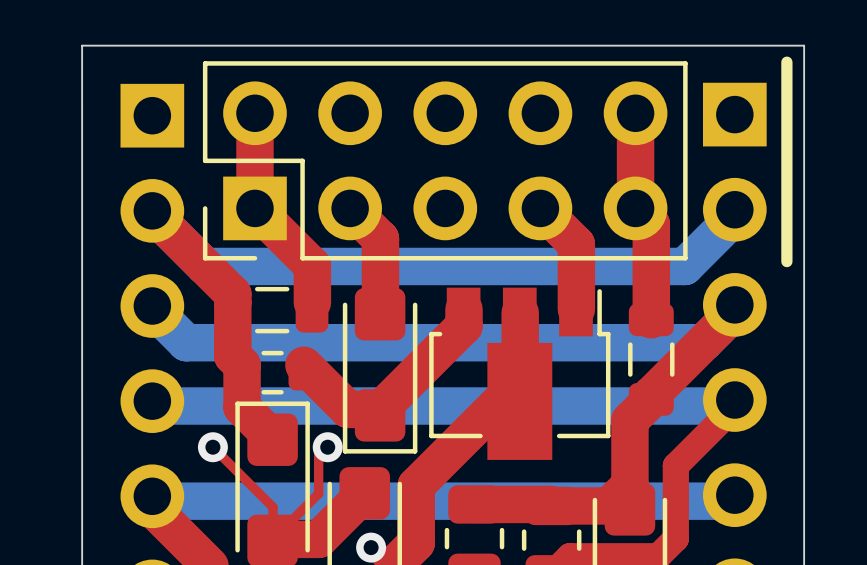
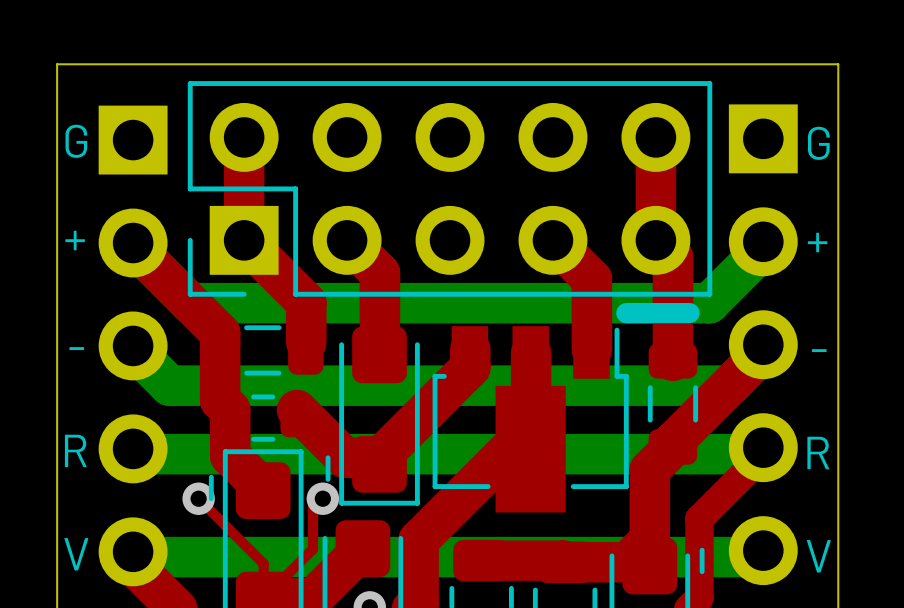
line: (786, 62) (786, 261) -> none
text: none -> G (76, 141)
text: none -> G (818, 143)
text: none -> + (75, 240)
text: none -> + (817, 242)
line: none -> (626, 313) (689, 313)
text: none -> - (76, 348)
text: none -> - (819, 350)
text: none -> R (75, 450)
text: none -> R (818, 452)
line: none -> (328, 457) (328, 479)
line: none -> (211, 477) (211, 498)
line: none -> (702, 550) (702, 571)
text: none -> V (76, 554)
text: none -> V (818, 556)

